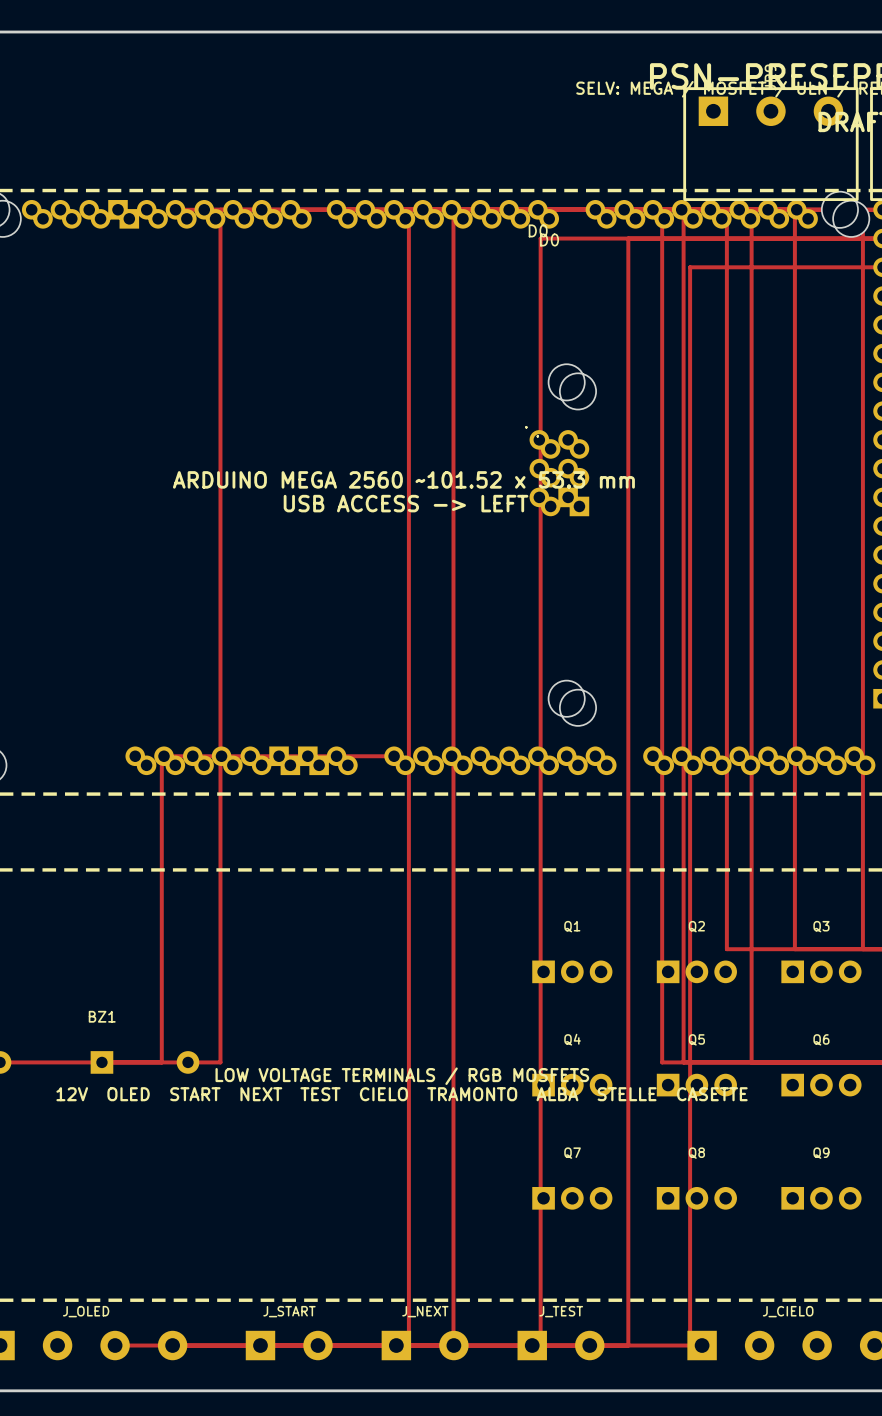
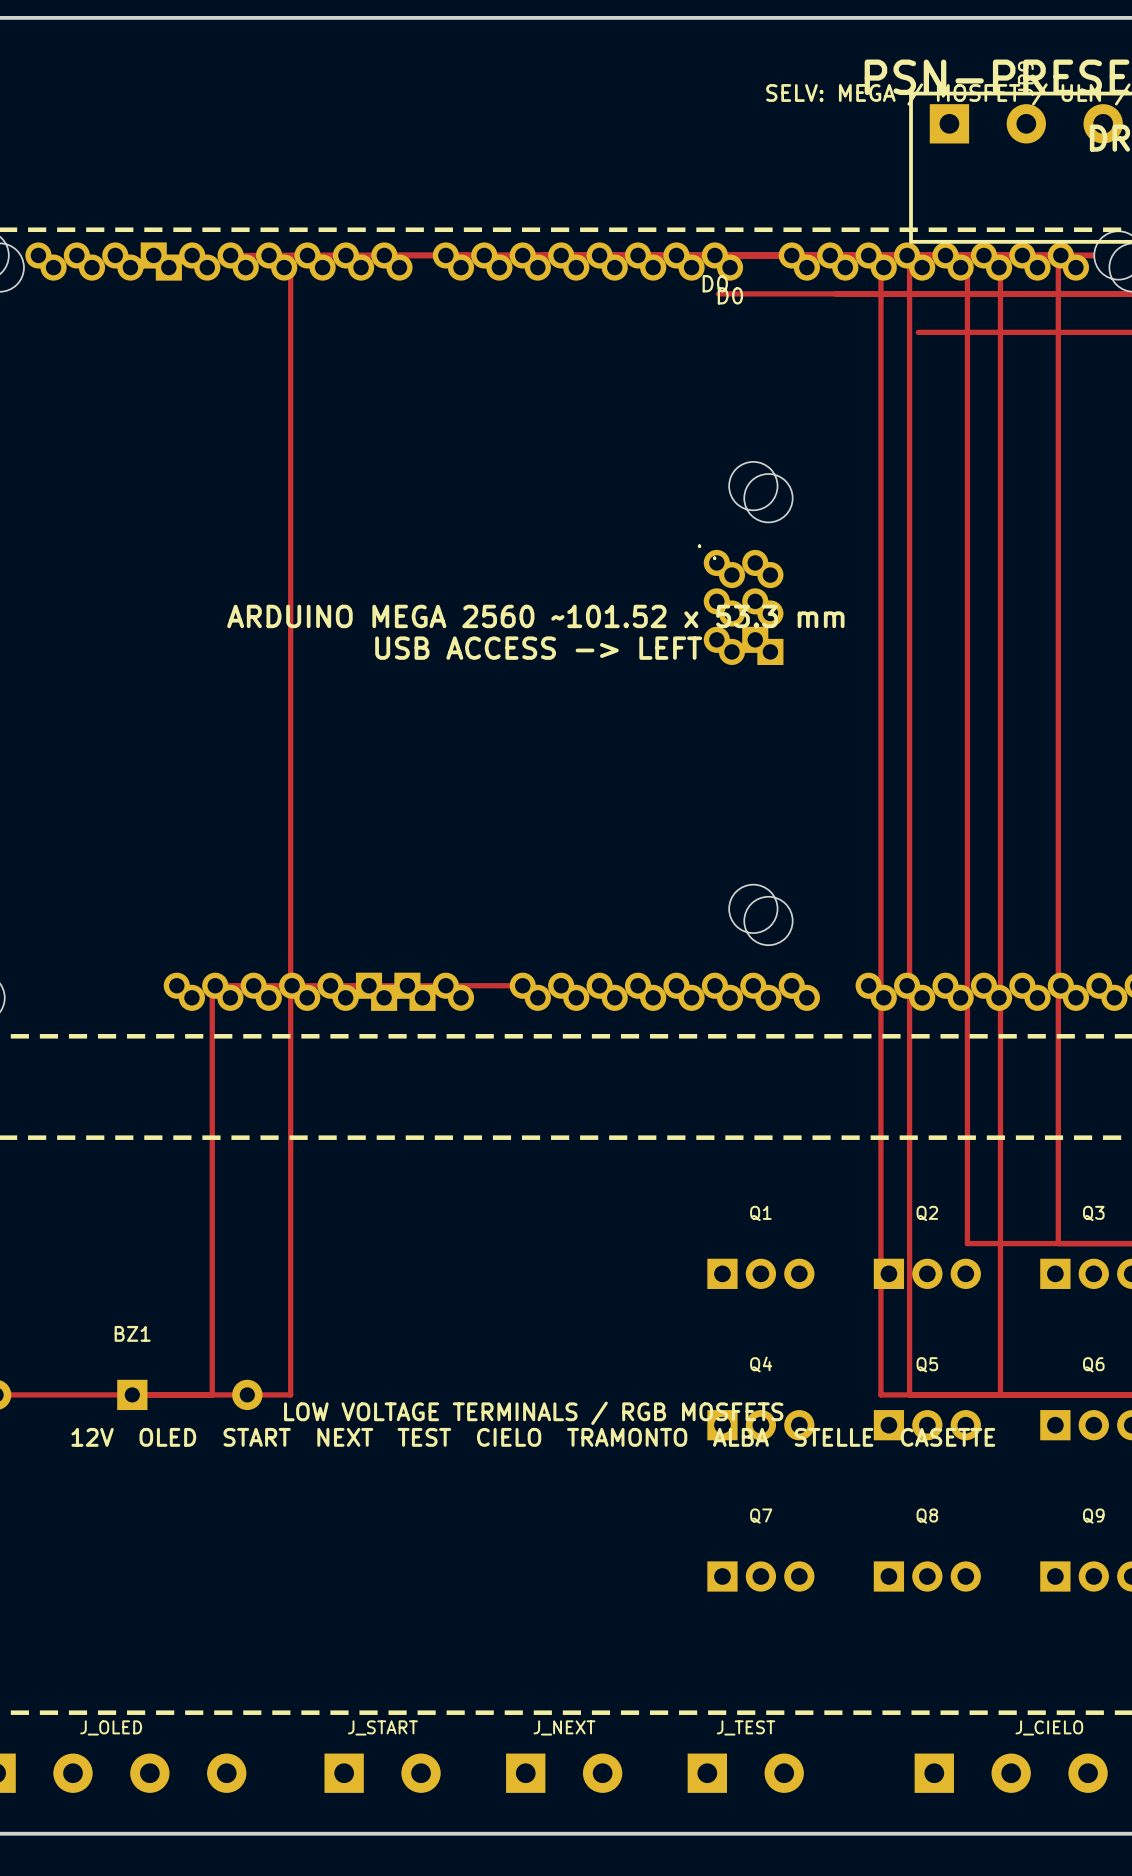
track: (408, 209) (408, 1345) -> none
track: (453, 209) (453, 1345) -> none
track: (540, 238) (540, 1345) -> none
track: (628, 238) (628, 1345) -> none
track: (690, 267) (690, 1345) (115, 1345) -> none

